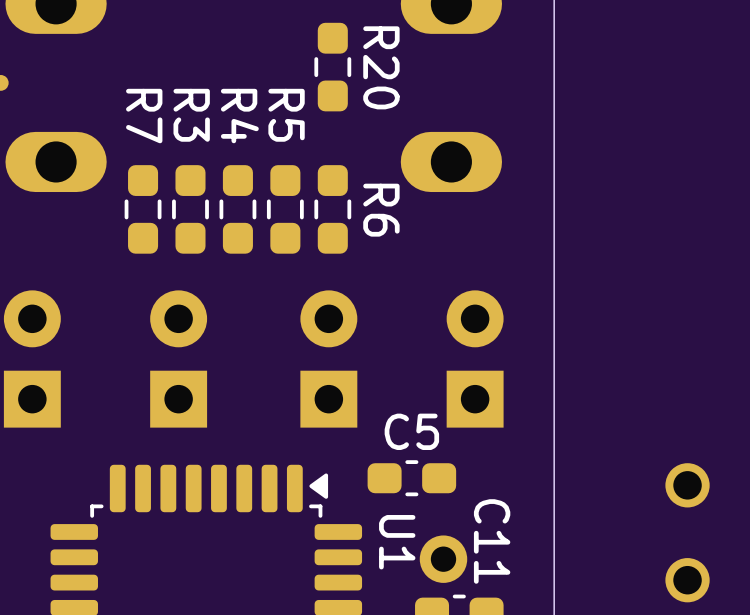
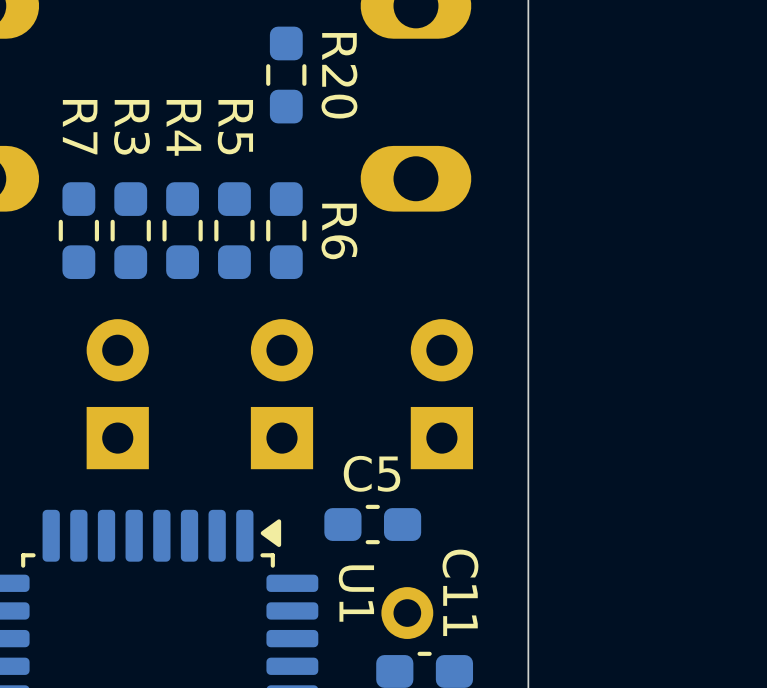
part: (687, 485) -> none
part: (687, 580) -> none

